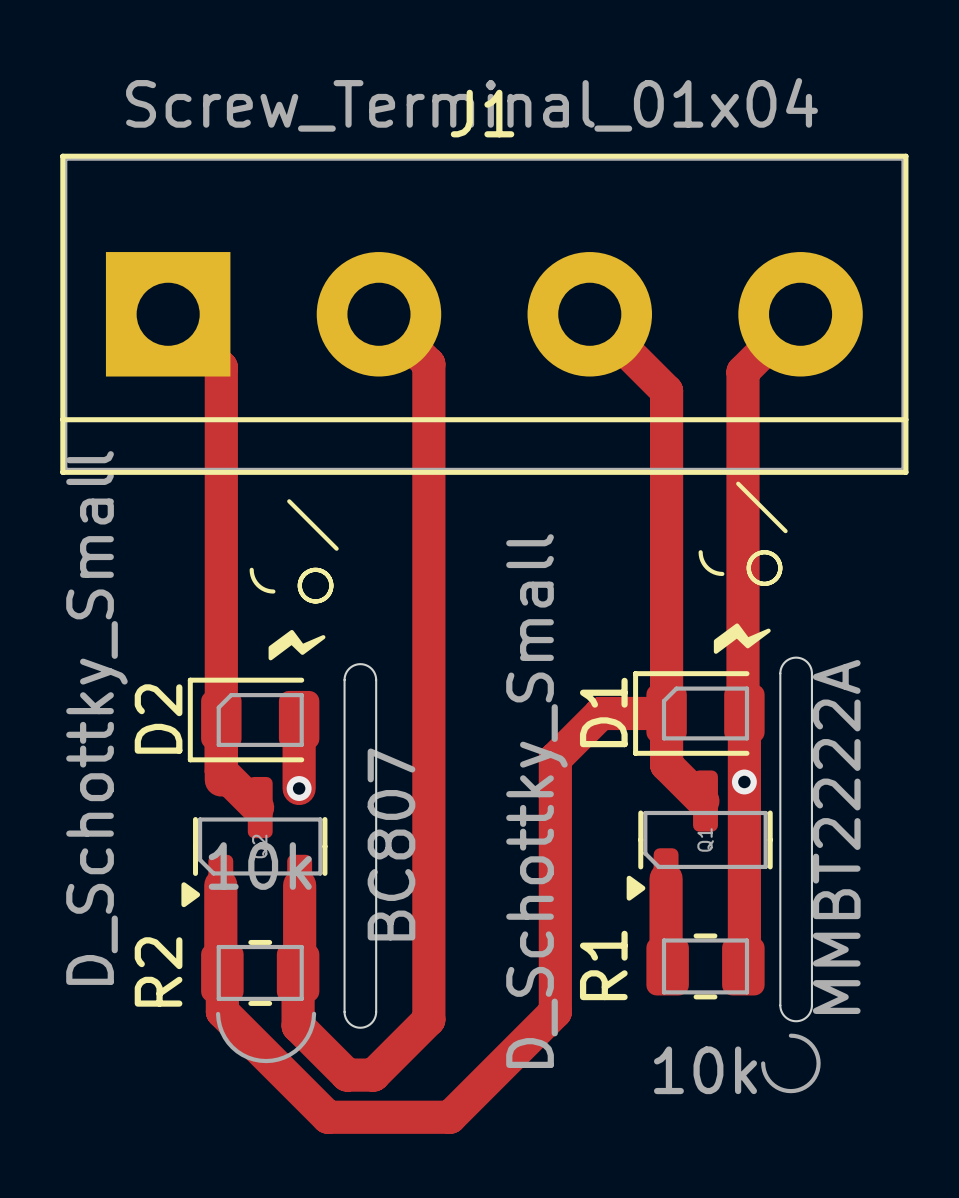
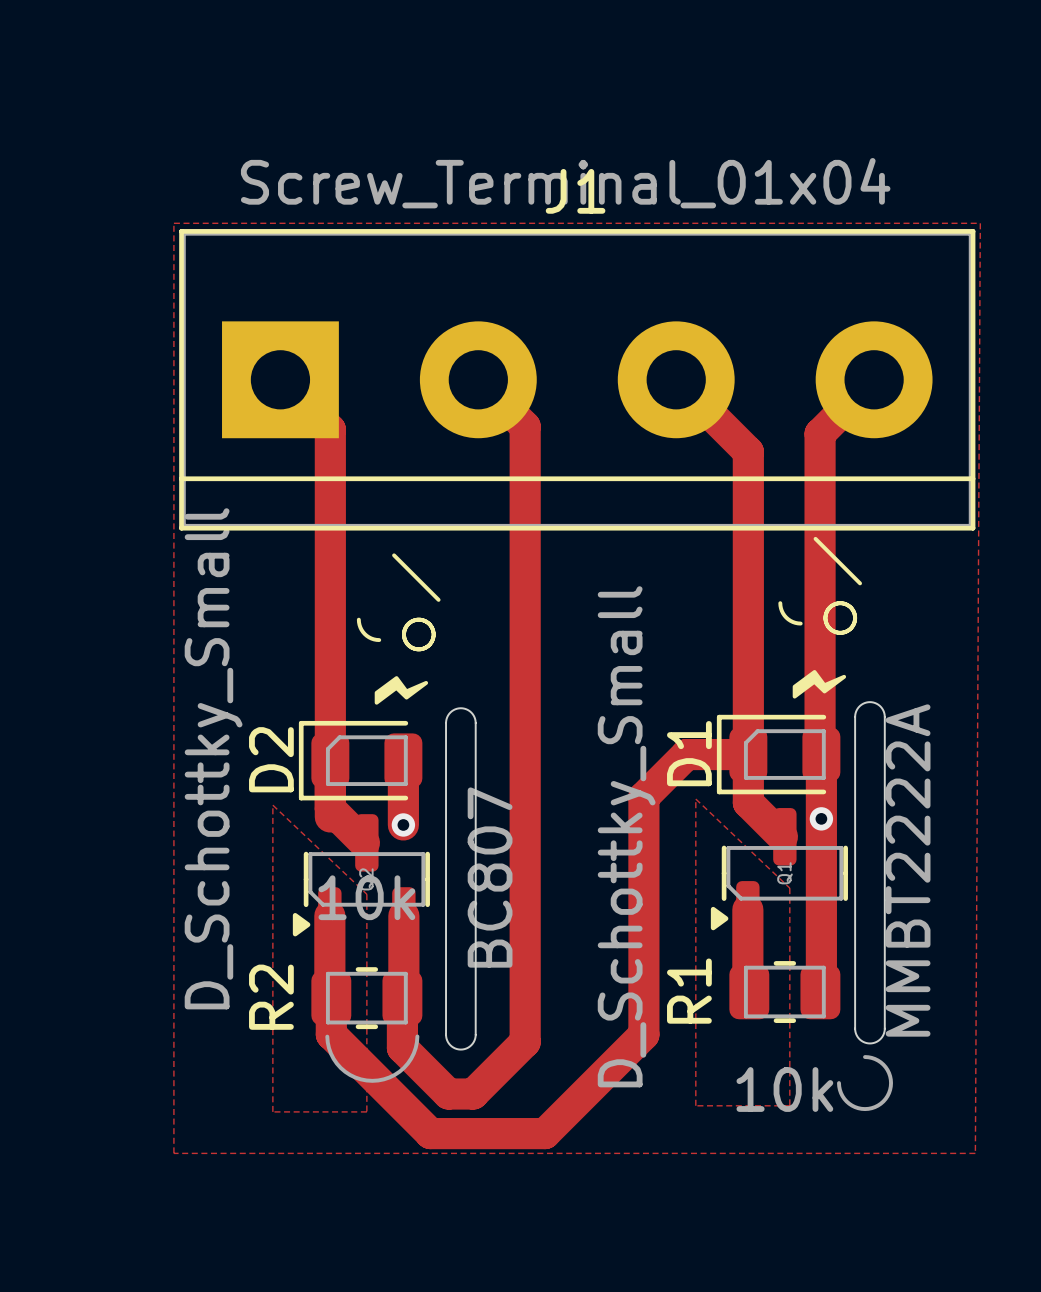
zone outline: none -> (173, 223) (980, 223) (975, 1153) (173, 1153) (173, 223)
zone outline: none -> (695, 799) (695, 1105) (789, 1105) (789, 888) (695, 799)
zone outline: none -> (272, 805) (272, 1111) (366, 1111) (366, 894) (272, 805)

